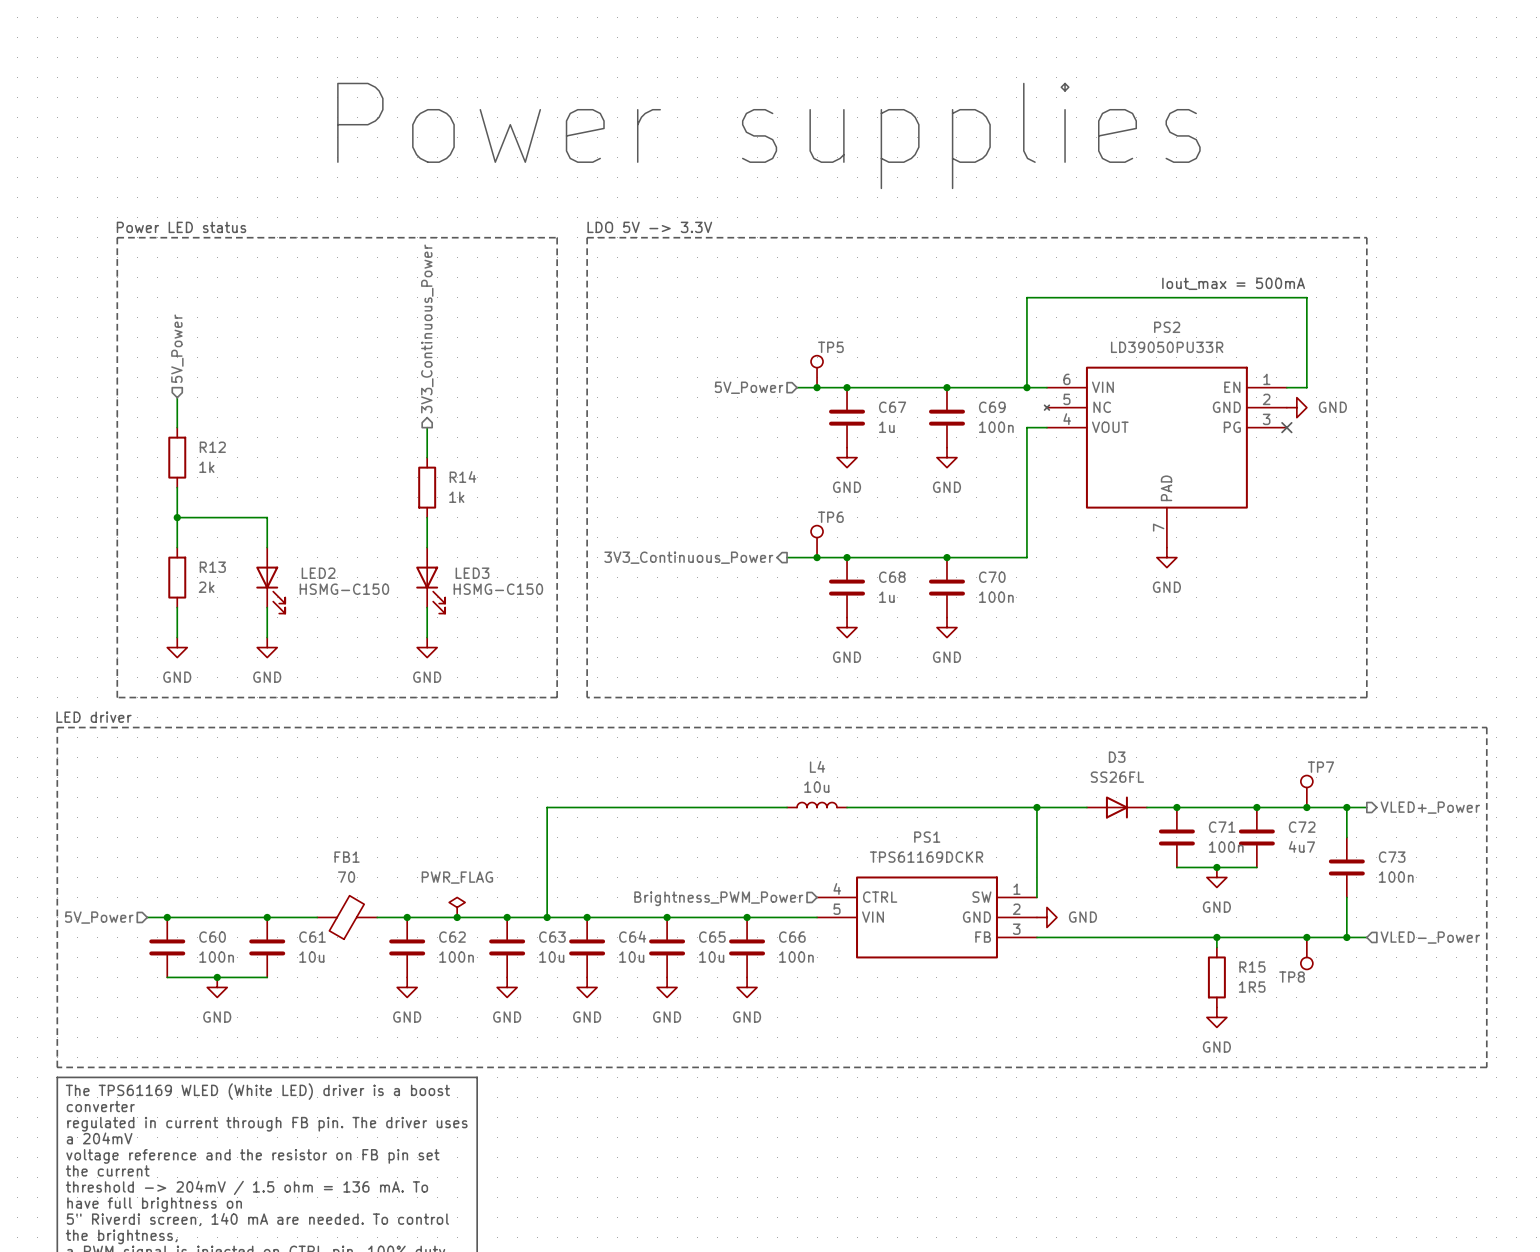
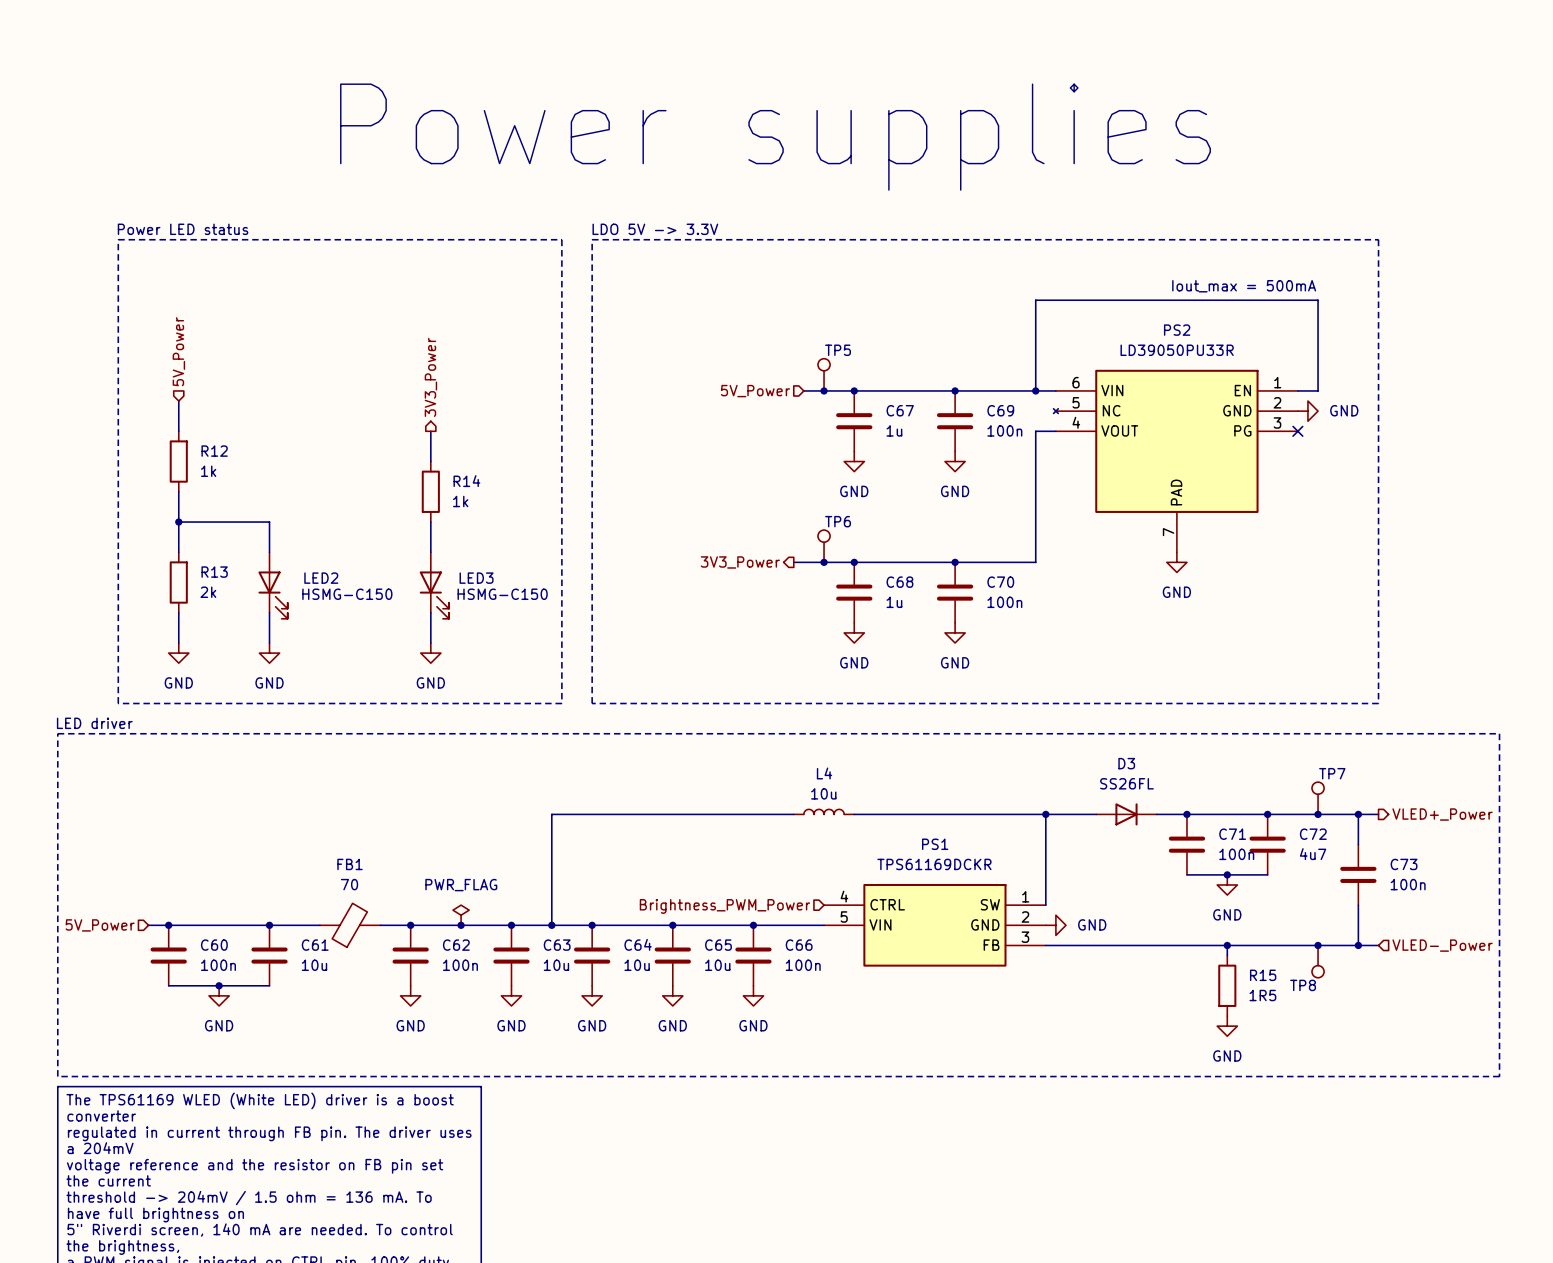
hierarchical label: 3V3_Continuous_Power (427, 328) -> 3V3_Power (430, 377)
hierarchical label: 3V3_Continuous_Power (688, 557) -> 3V3_Power (740, 562)

